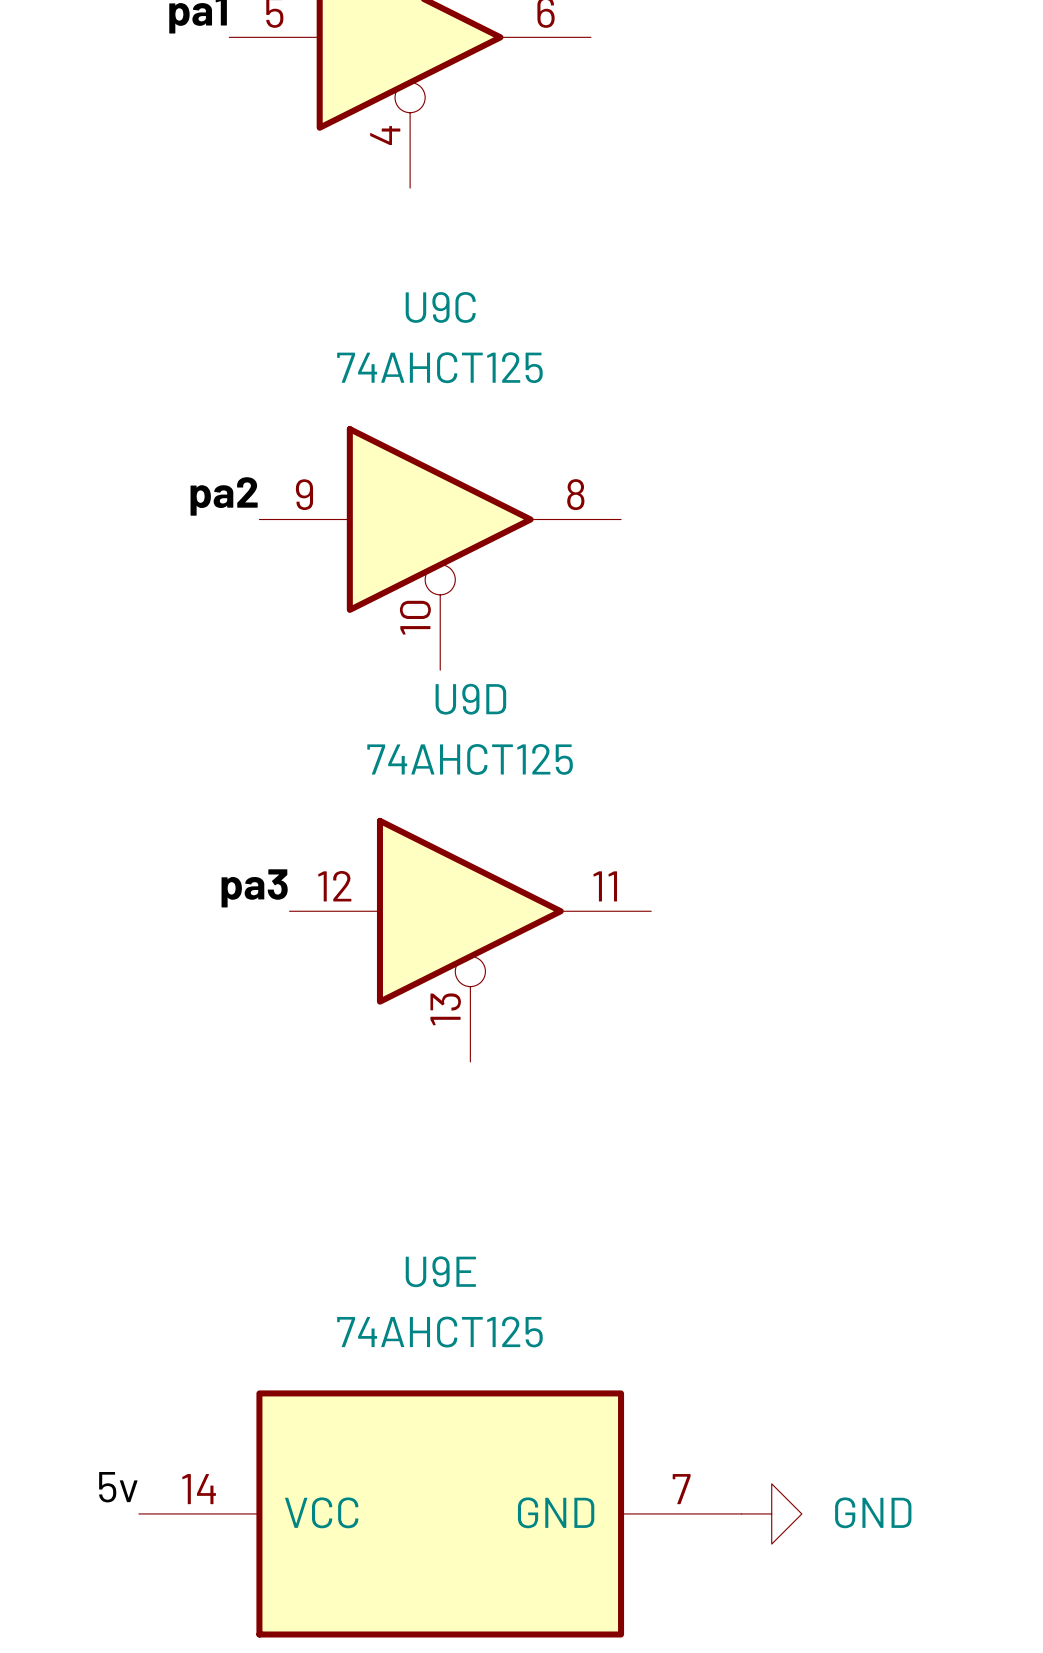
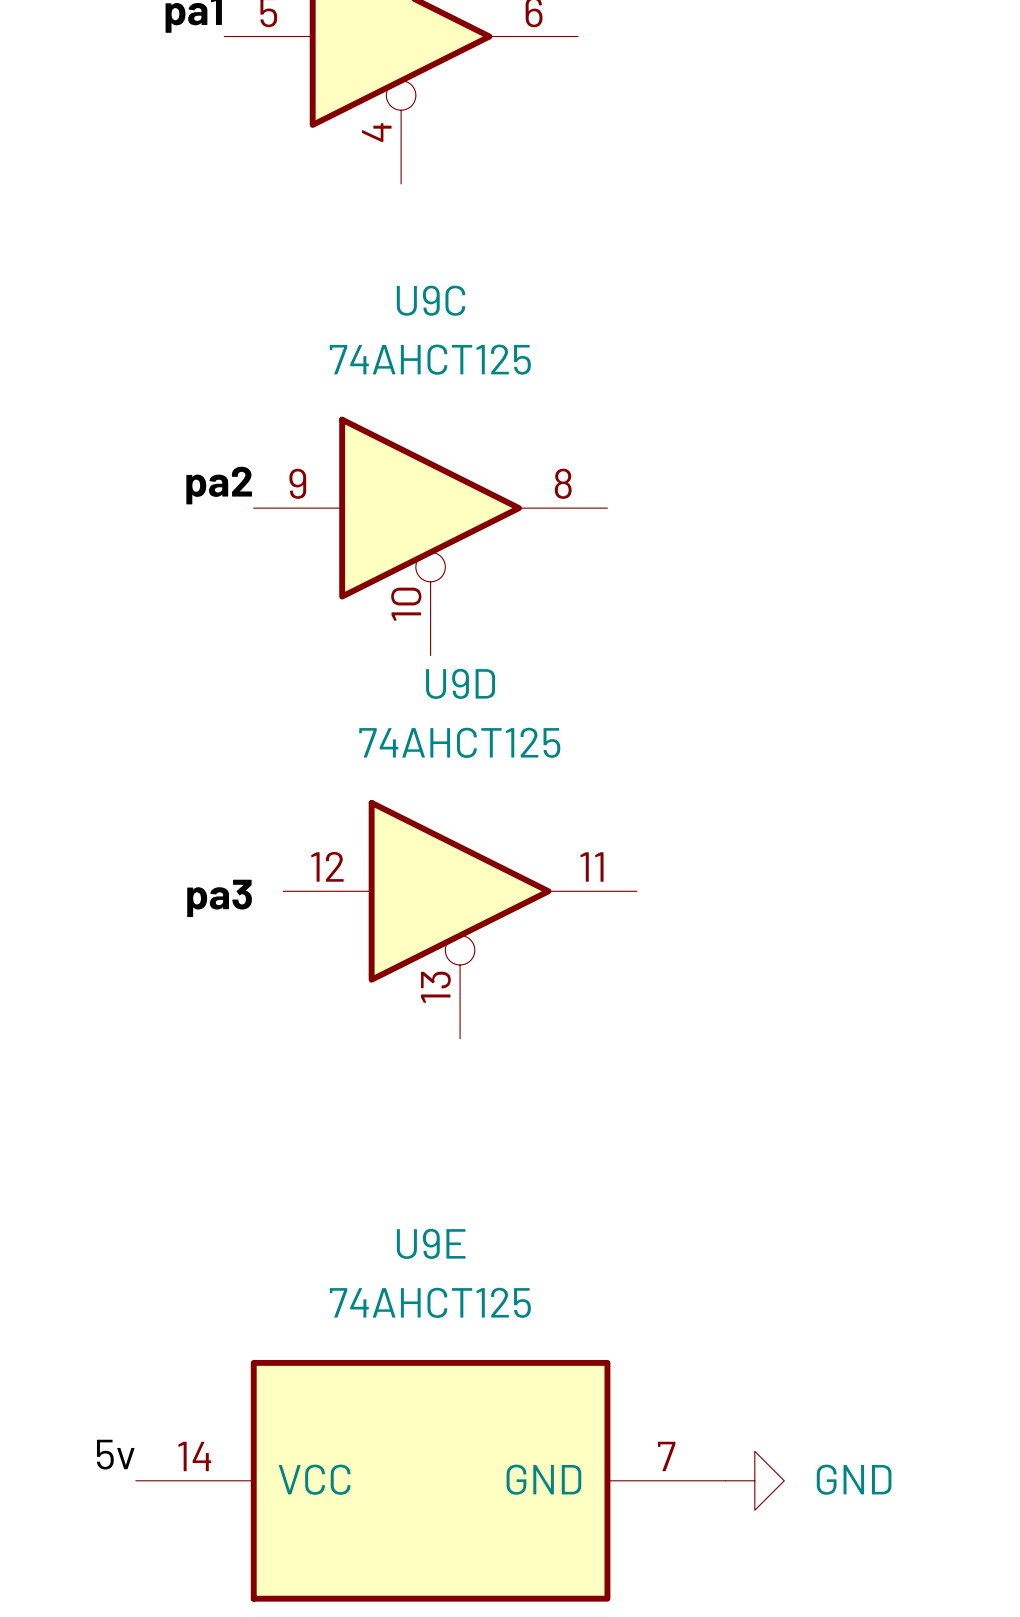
label position: pa3 (254, 888) -> pa3 (219, 898)

